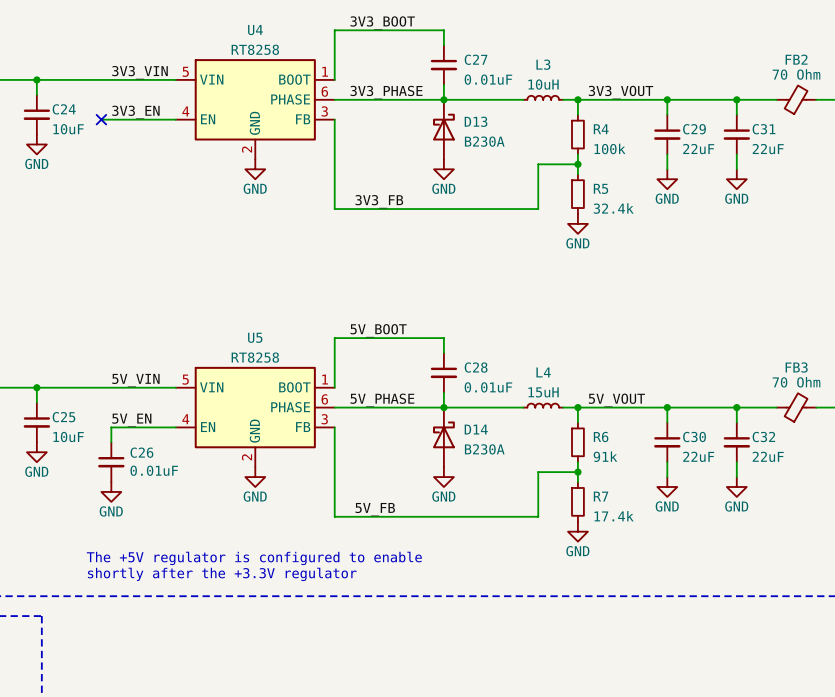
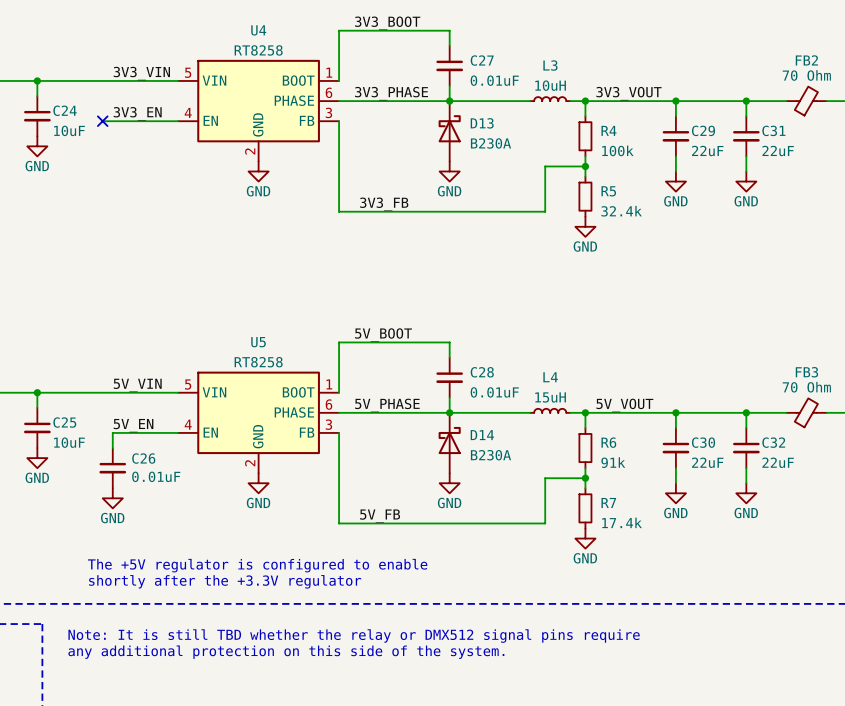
text: none -> Note: It is still TBD whether the relay or DMX512 signal pins require (354, 636)
text: none -> any additional protection on this side of the system. (286, 652)

